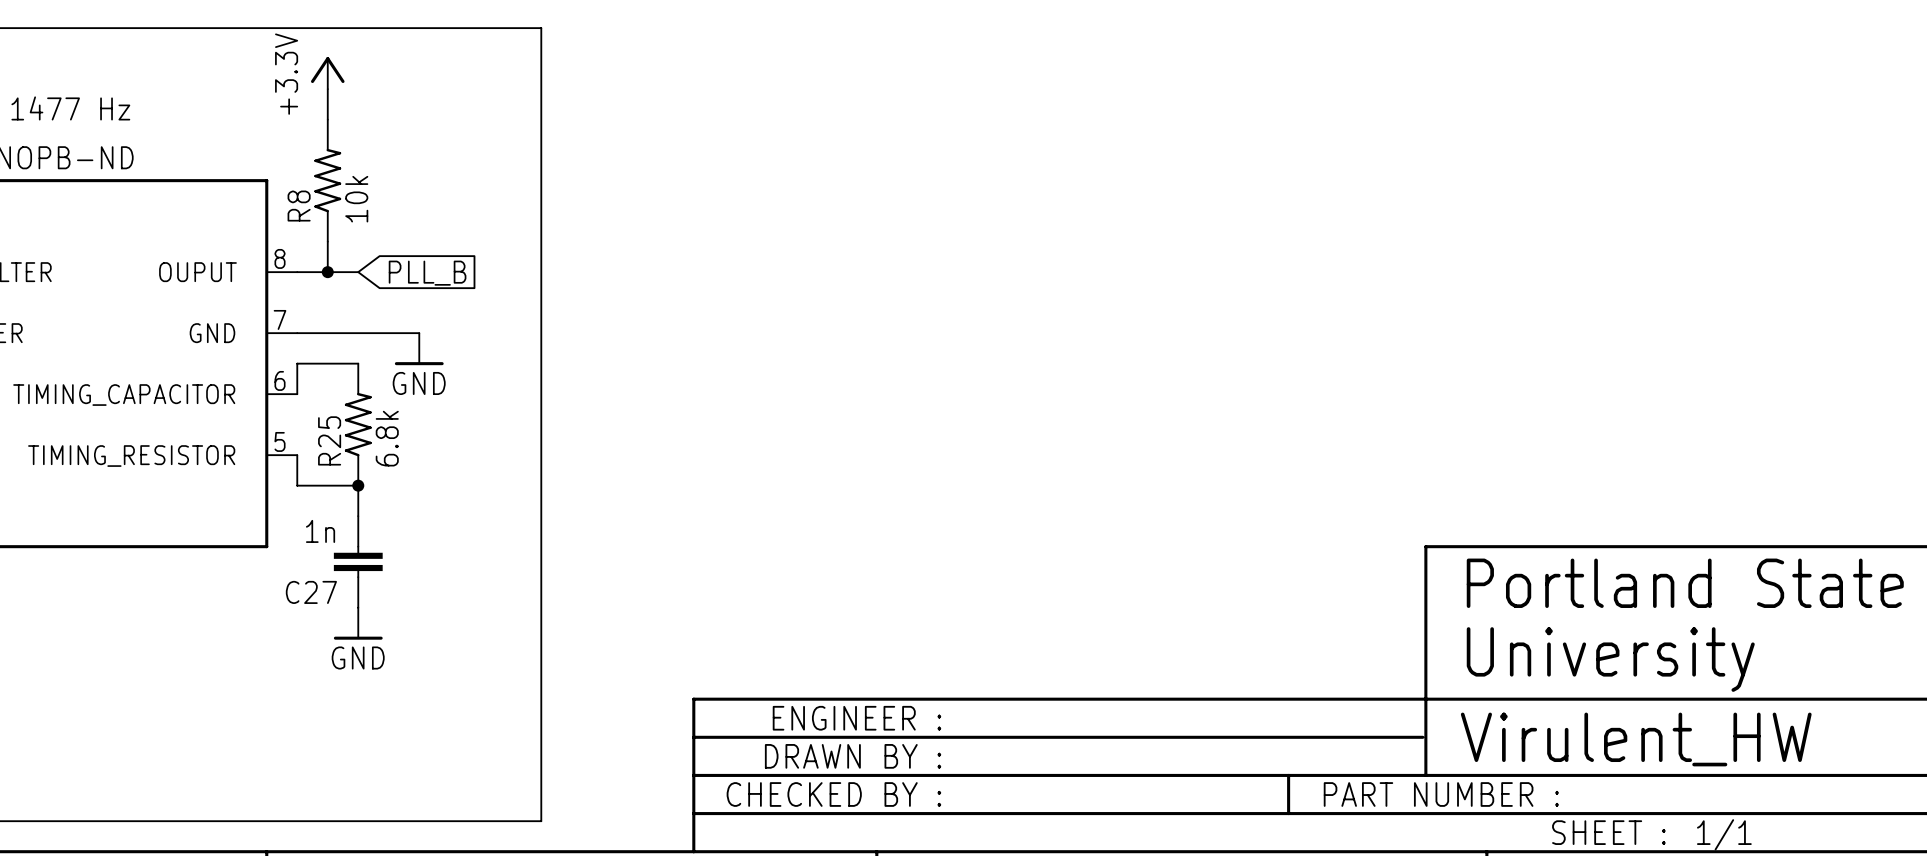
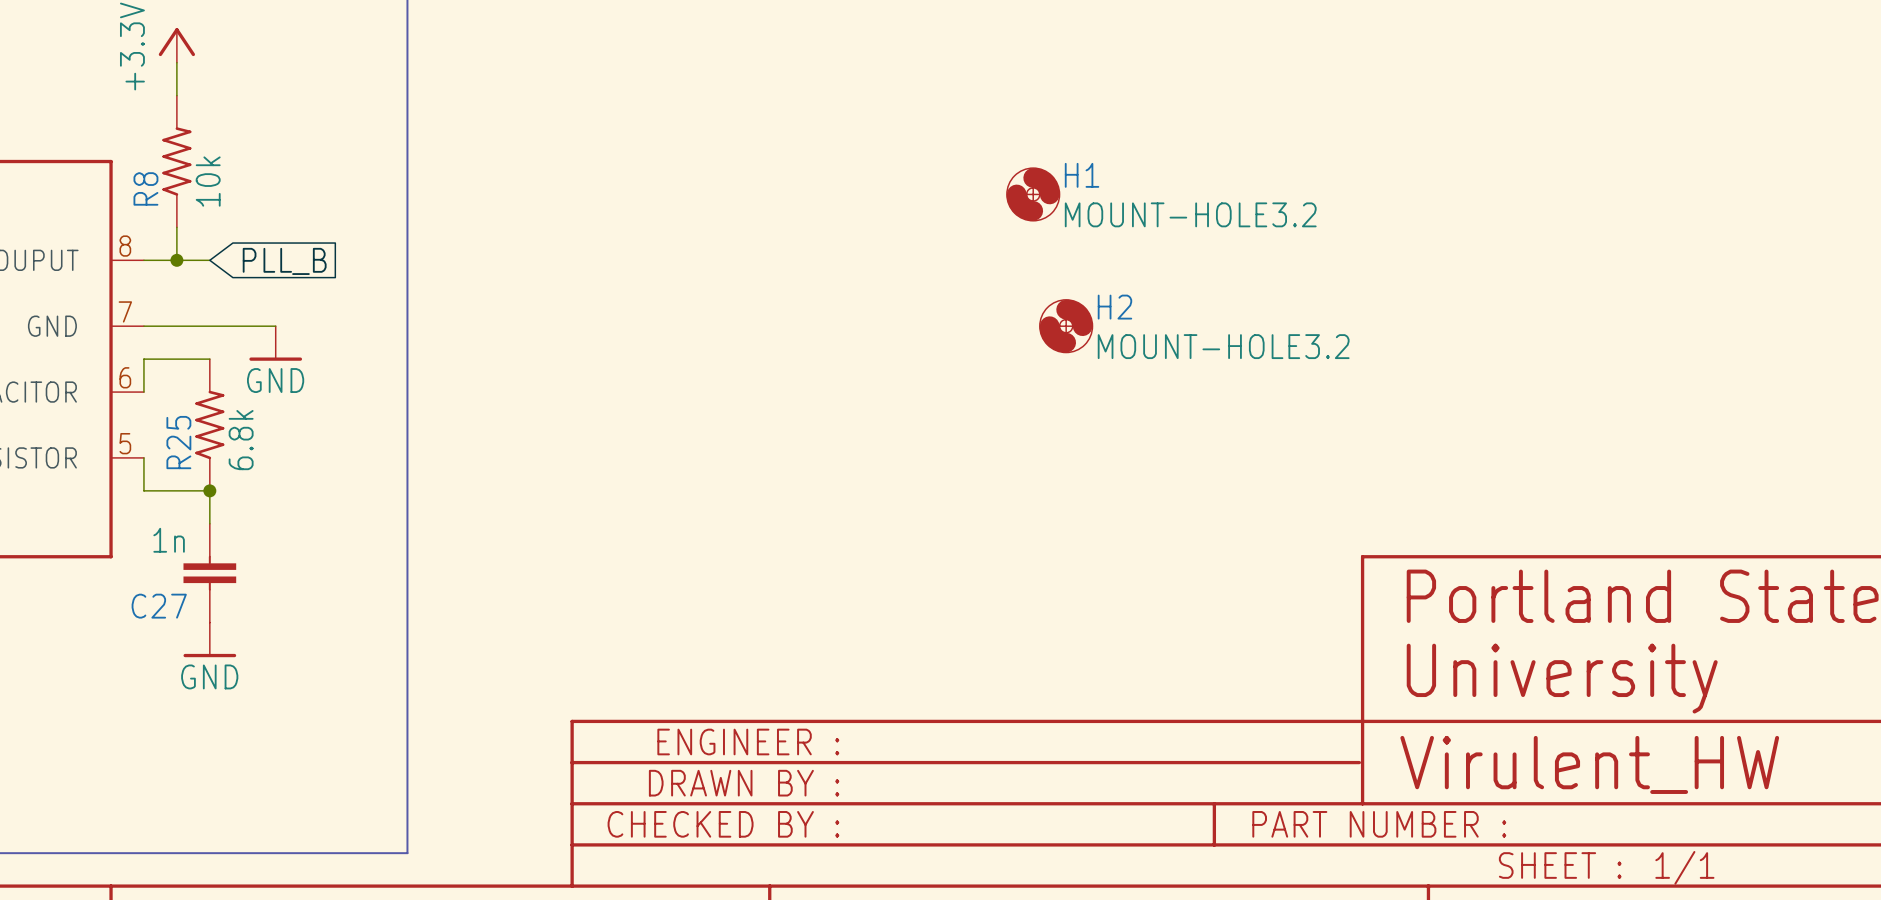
H1: none -> MOUNT-HOLE3.2 (1033, 194)
H2: none -> MOUNT-HOLE3.2 (1066, 326)

